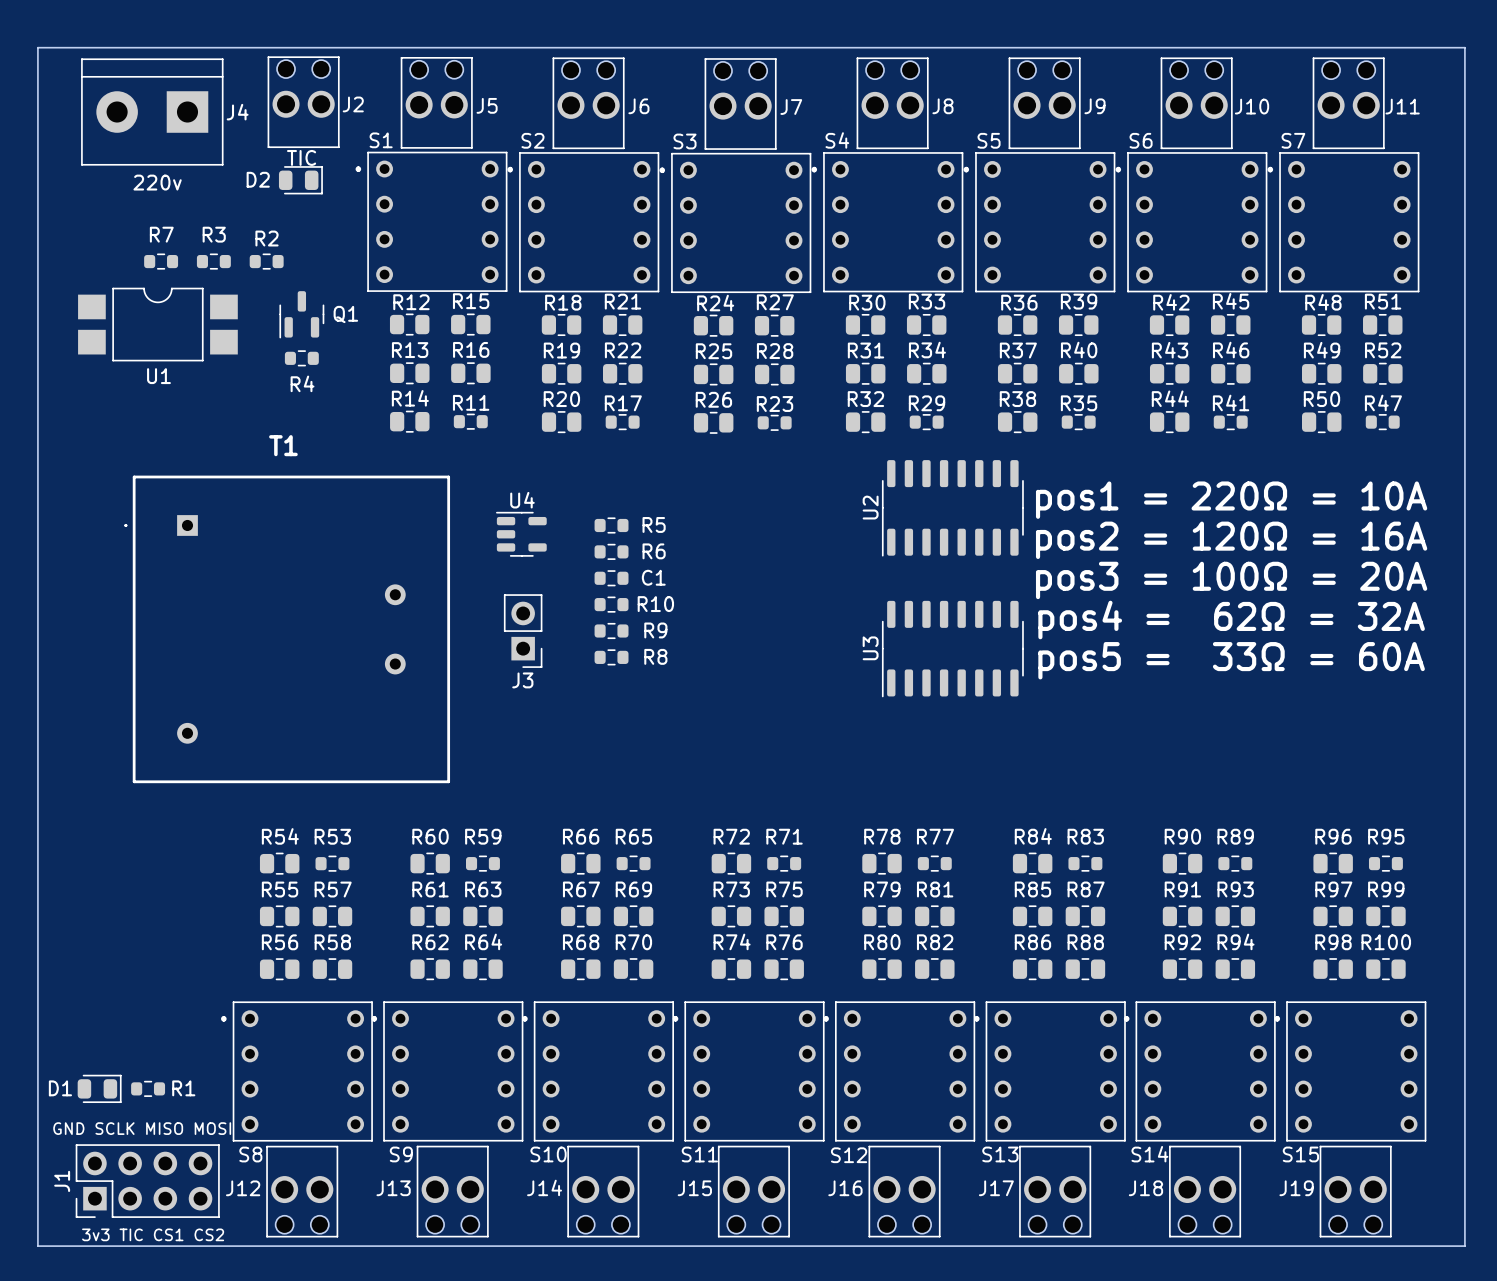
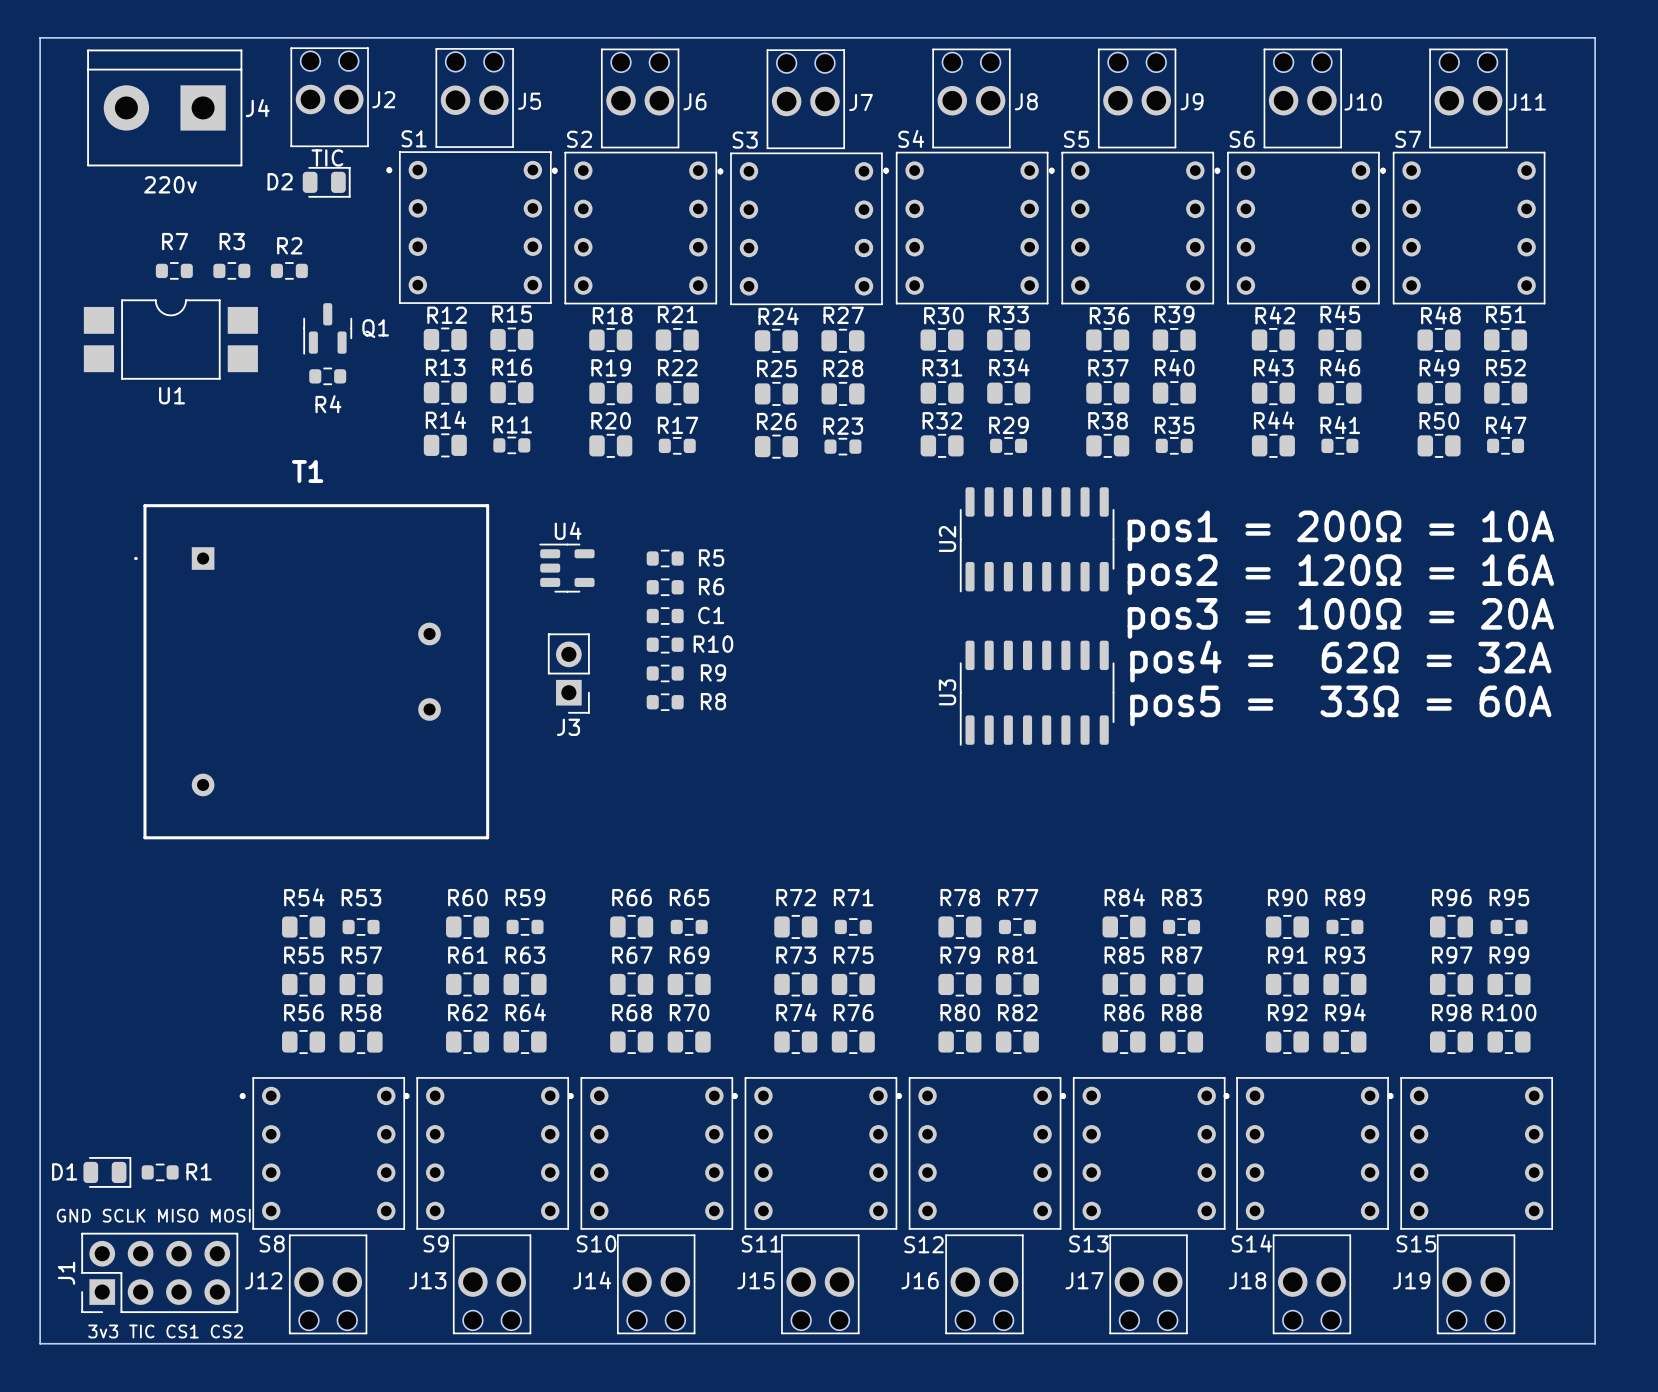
text: pos1 = 220Ω = 10A (1231, 500) -> pos1 = 200Ω = 10A (1340, 530)

